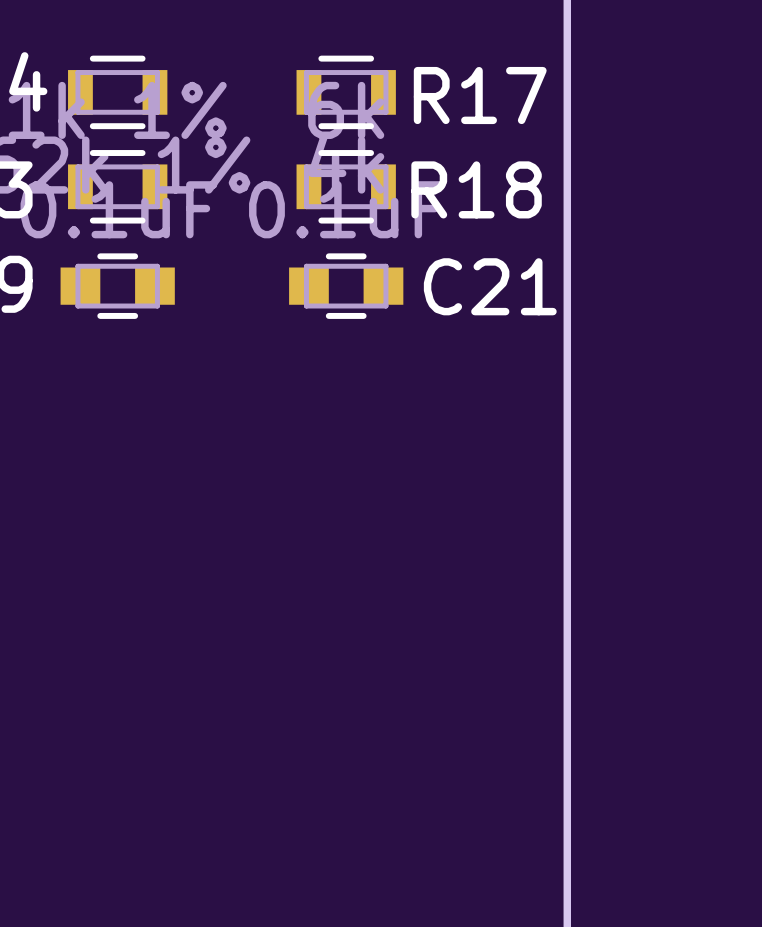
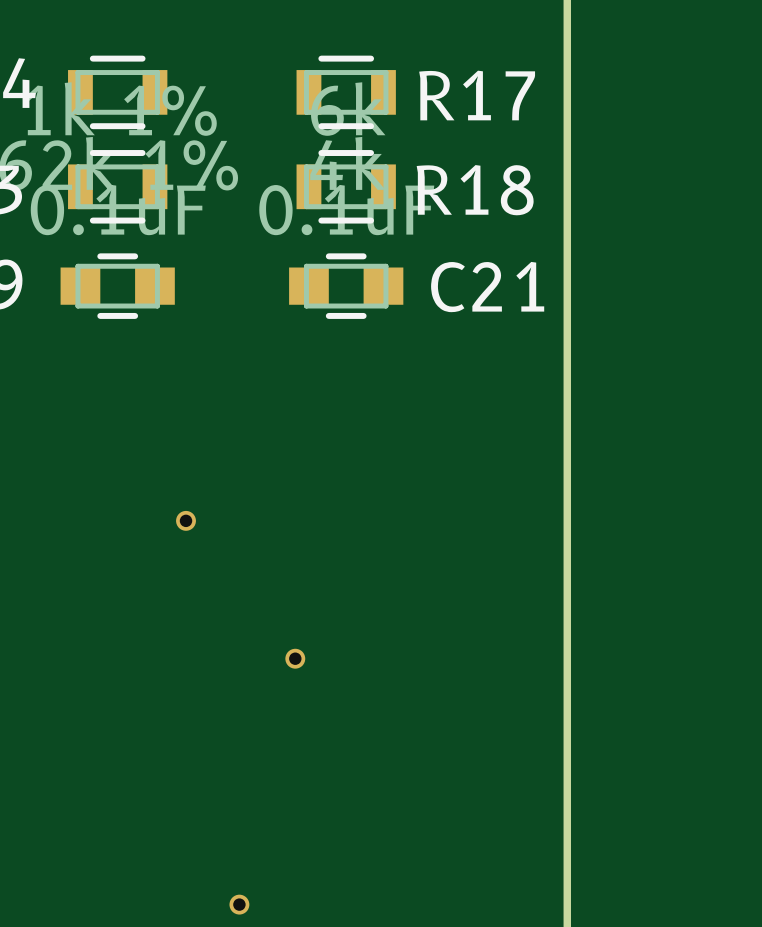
part: none -> (186, 520)
part: none -> (295, 658)
part: none -> (239, 904)

